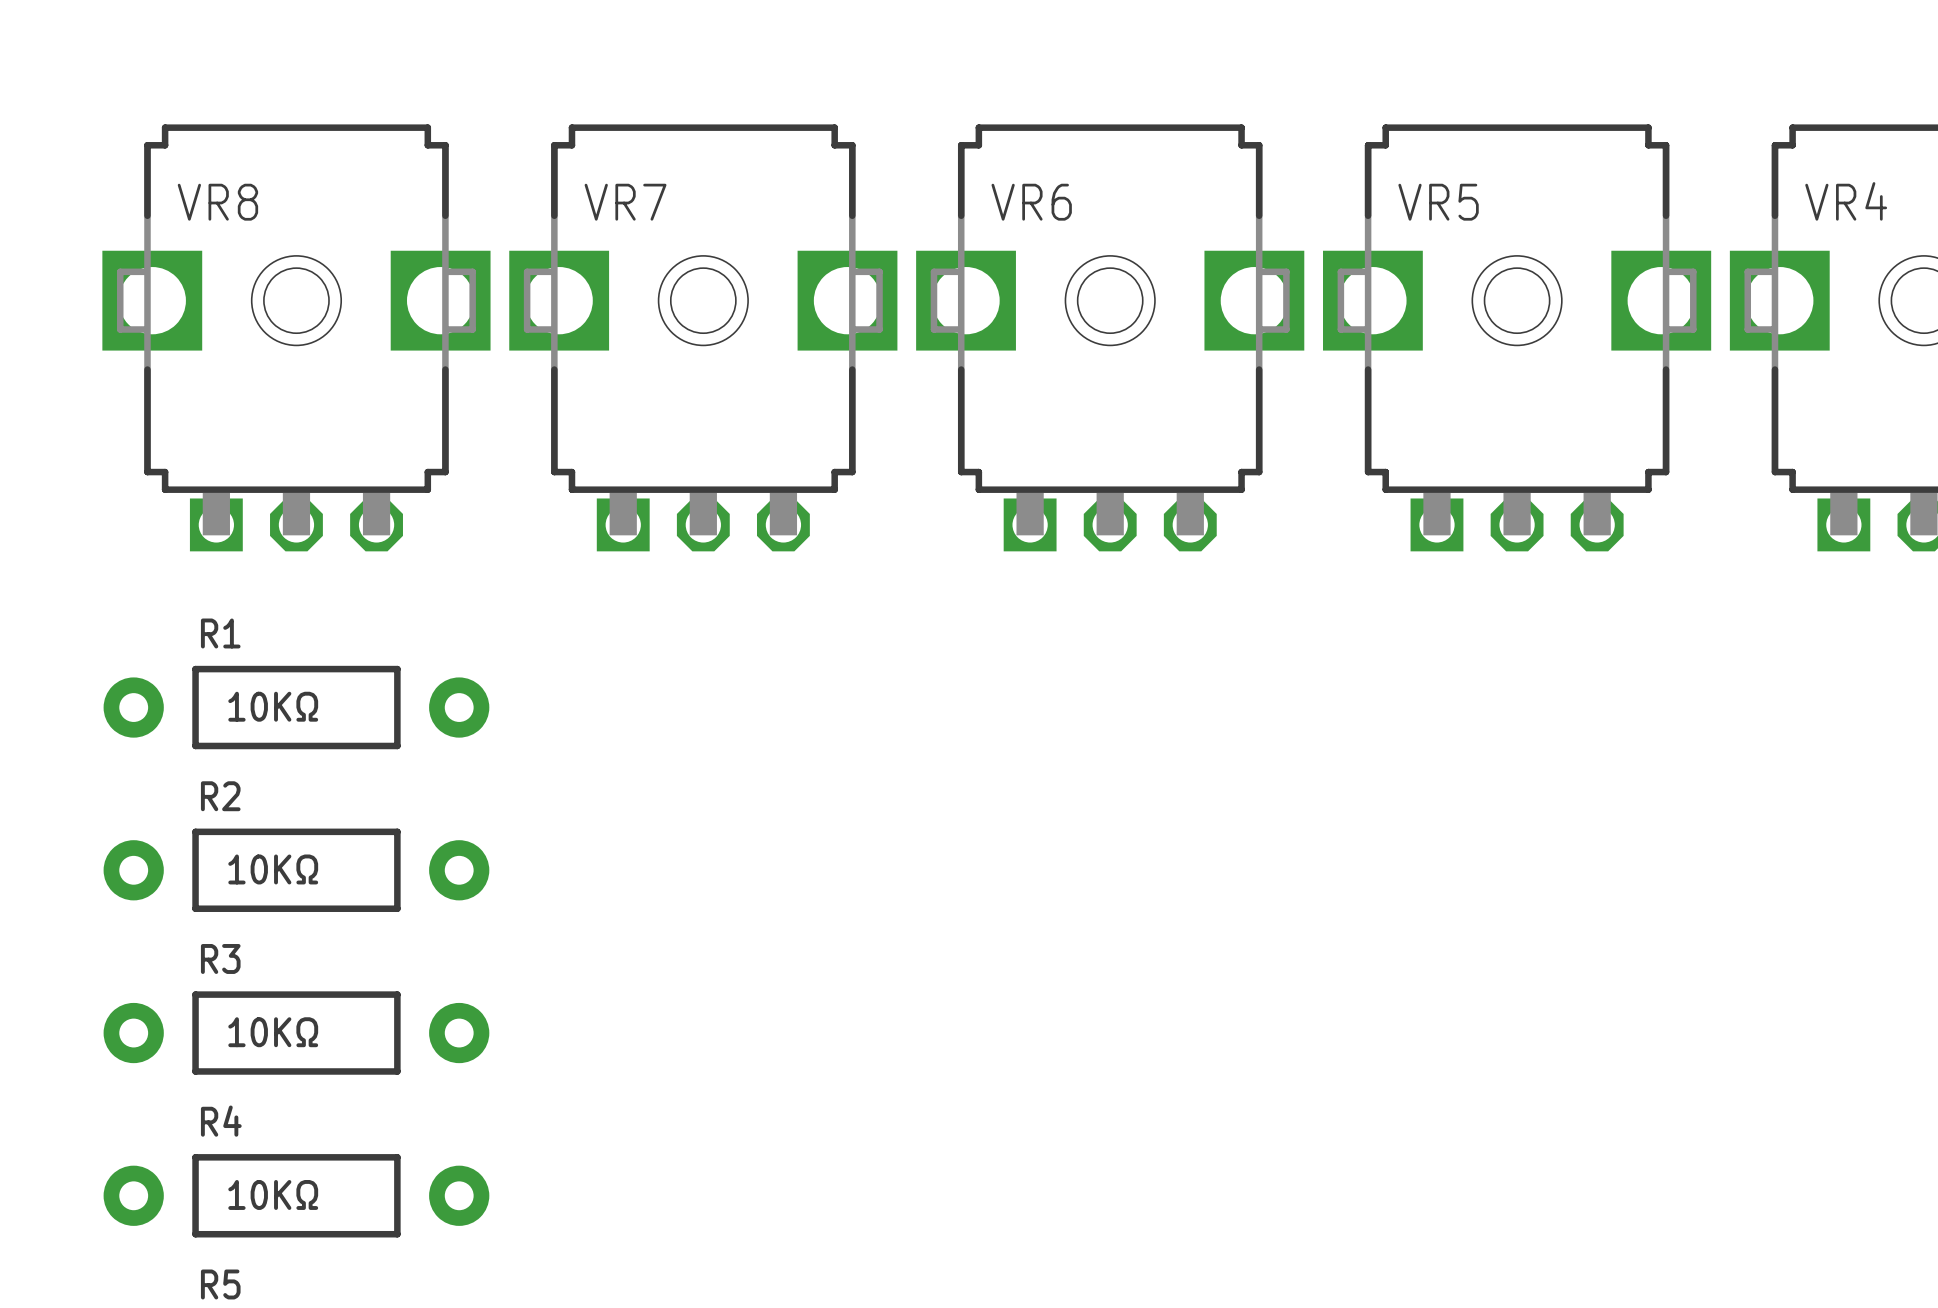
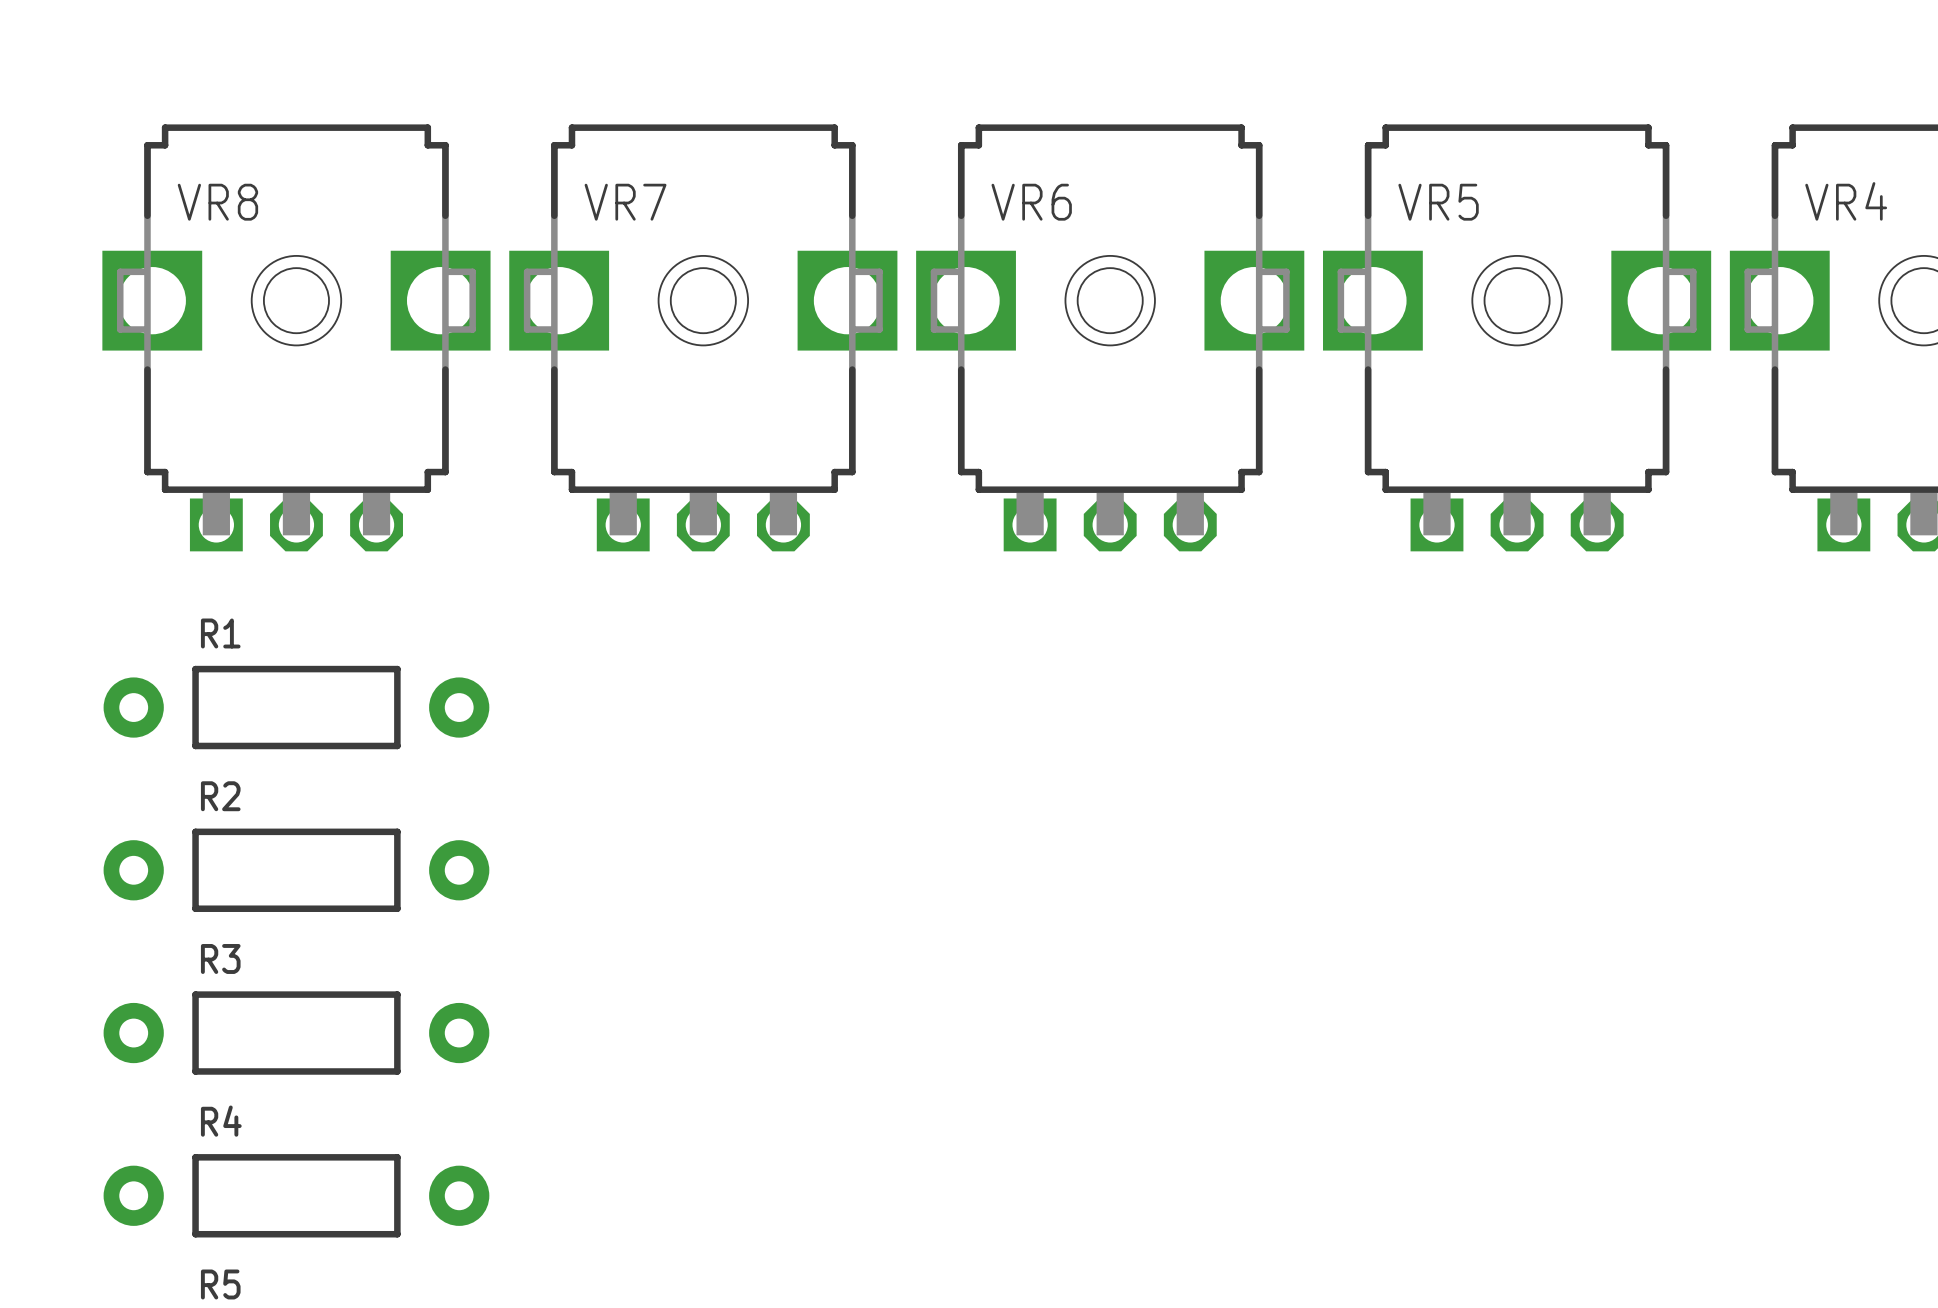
R1 value: 10KΩ (273, 706) -> none
R2 value: 10KΩ (273, 869) -> none
R3 value: 10KΩ (273, 1032) -> none
R4 value: 10KΩ (273, 1194) -> none

